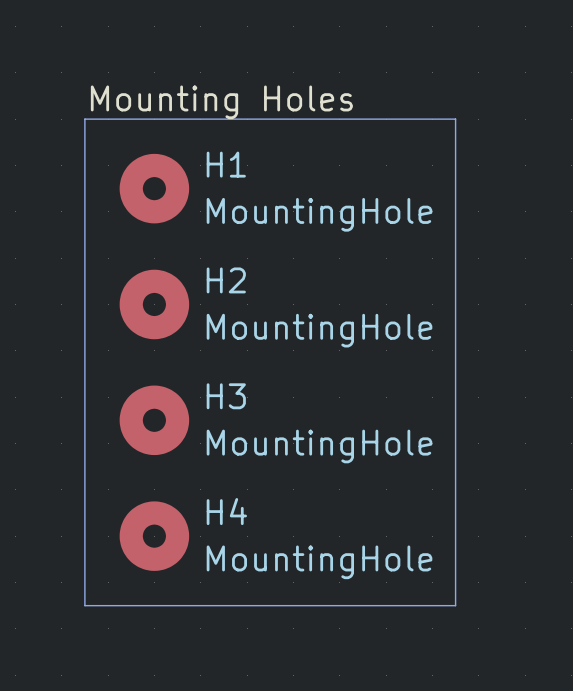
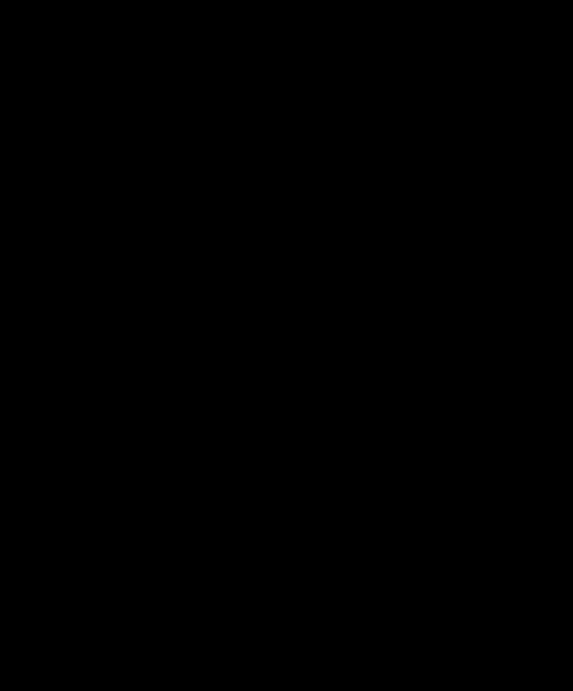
label: Mounting Holes (221, 102) -> none
line: (84, 119) (455, 119) (455, 605) (84, 605) (84, 119) -> none
H1: MountingHole (154, 188) -> none
H2: MountingHole (154, 304) -> none
H3: MountingHole (154, 420) -> none
H4: MountingHole (154, 536) -> none

